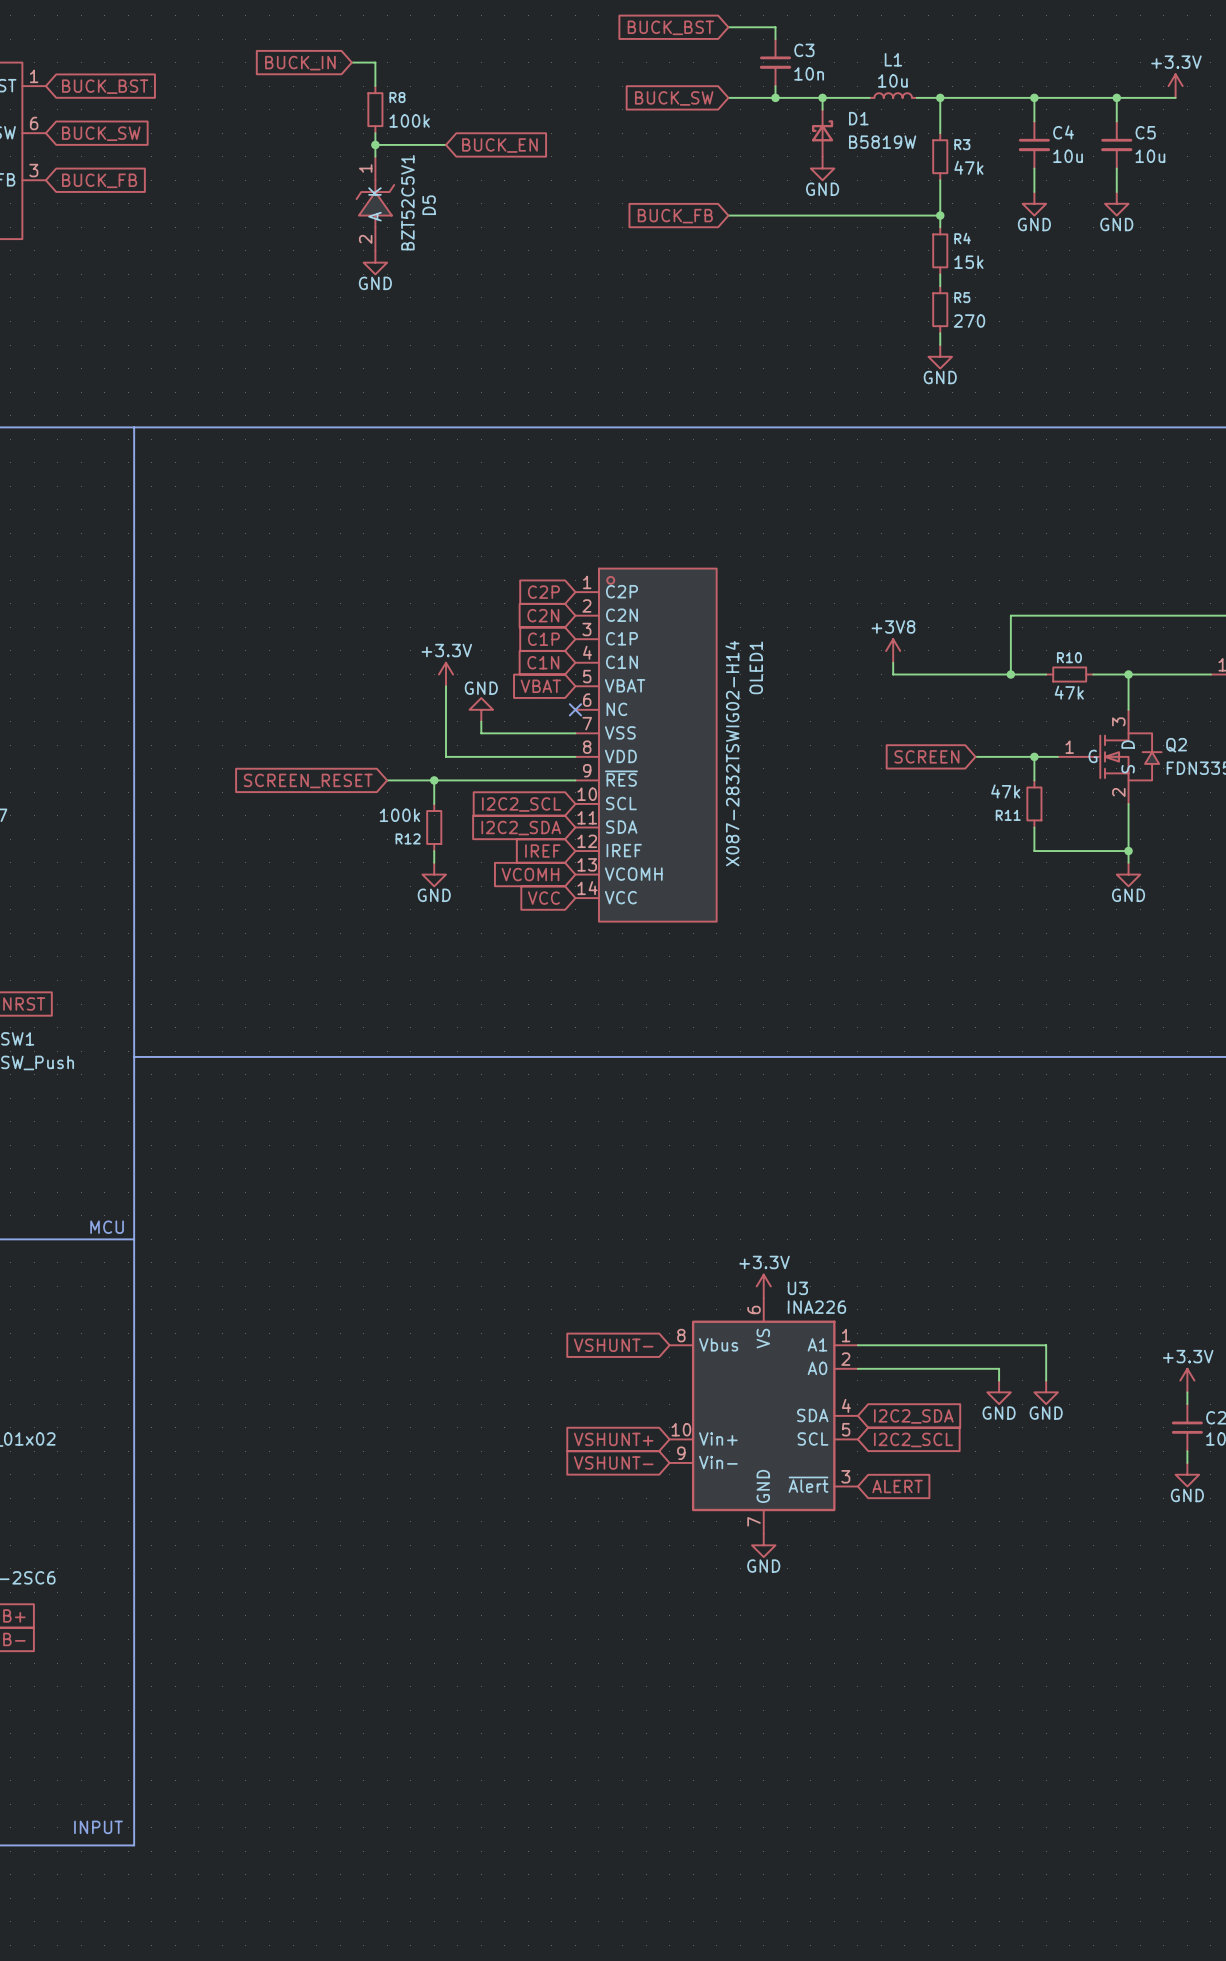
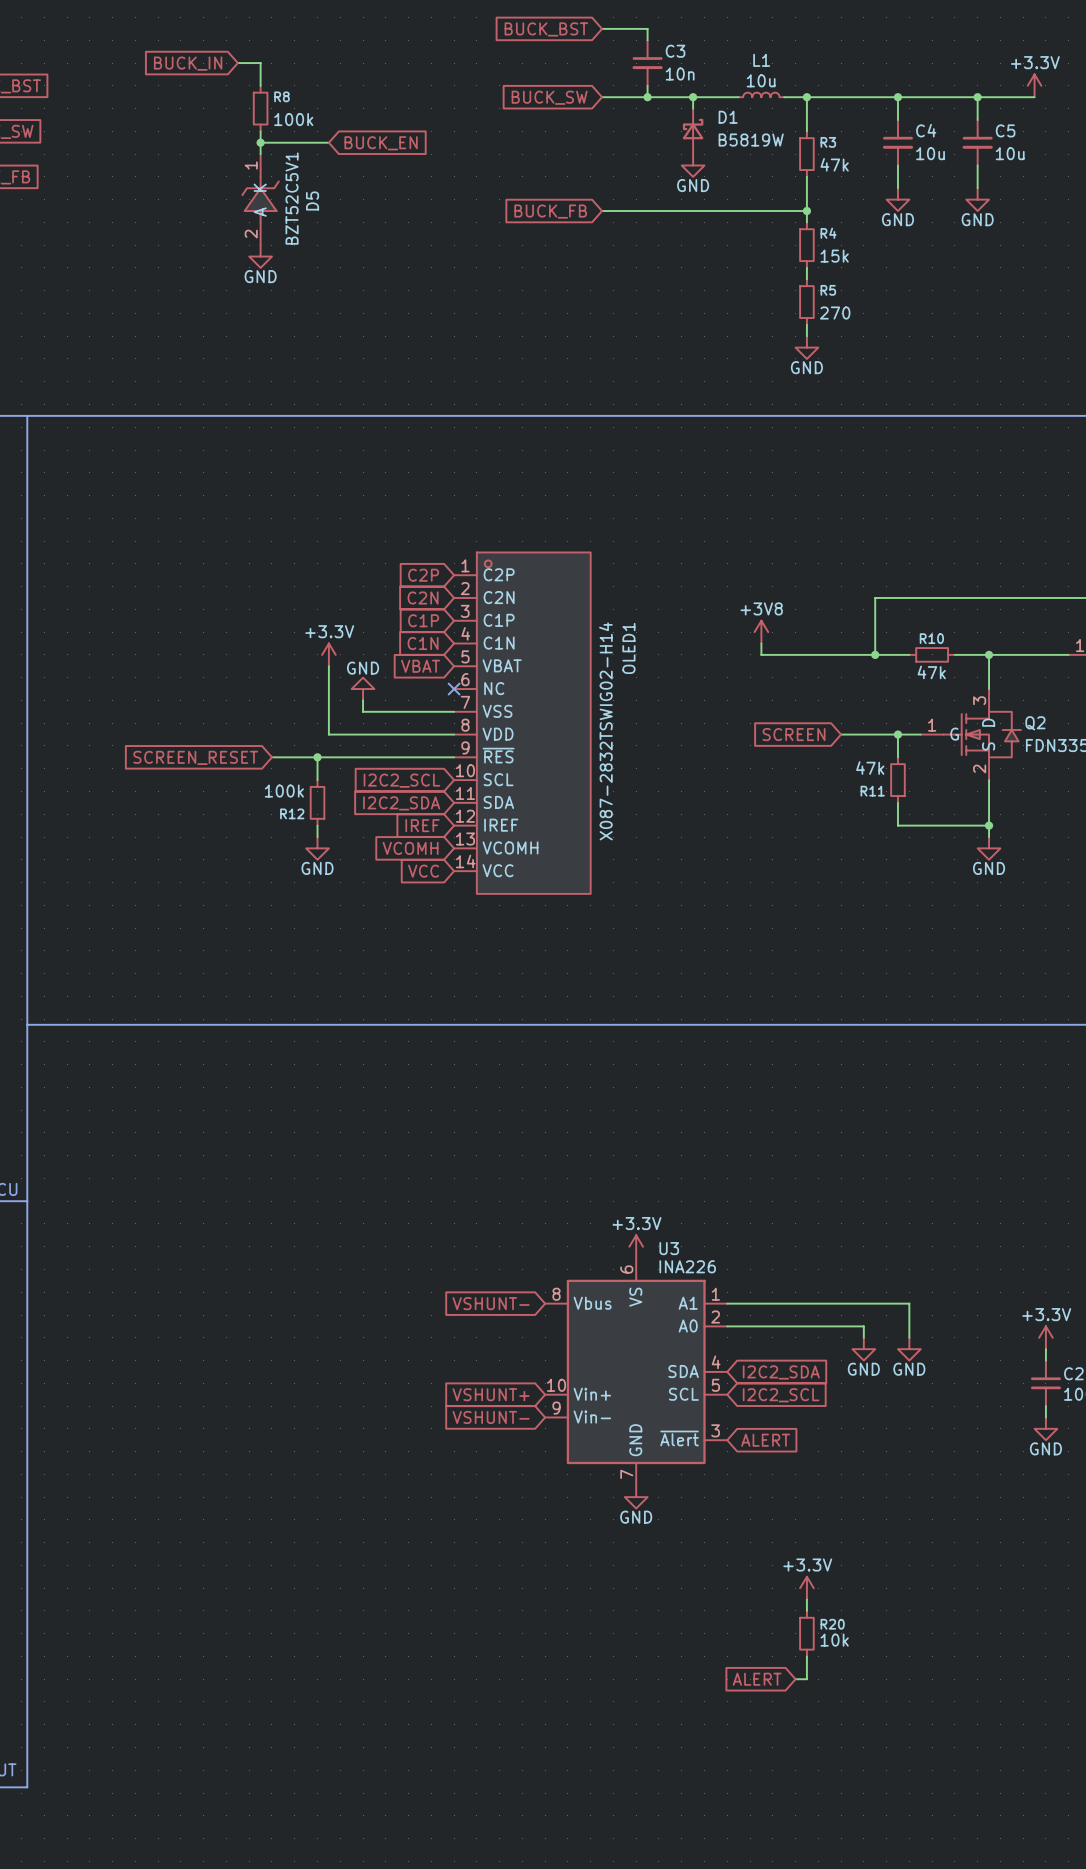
power symbol: none -> +3.3V (806, 1588)
wire: none -> (806, 1599) (806, 1610)
R20: none -> 10k (806, 1633)
wire: none -> (806, 1656) (806, 1679) (795, 1679)
global label: none -> ALERT (757, 1679)

